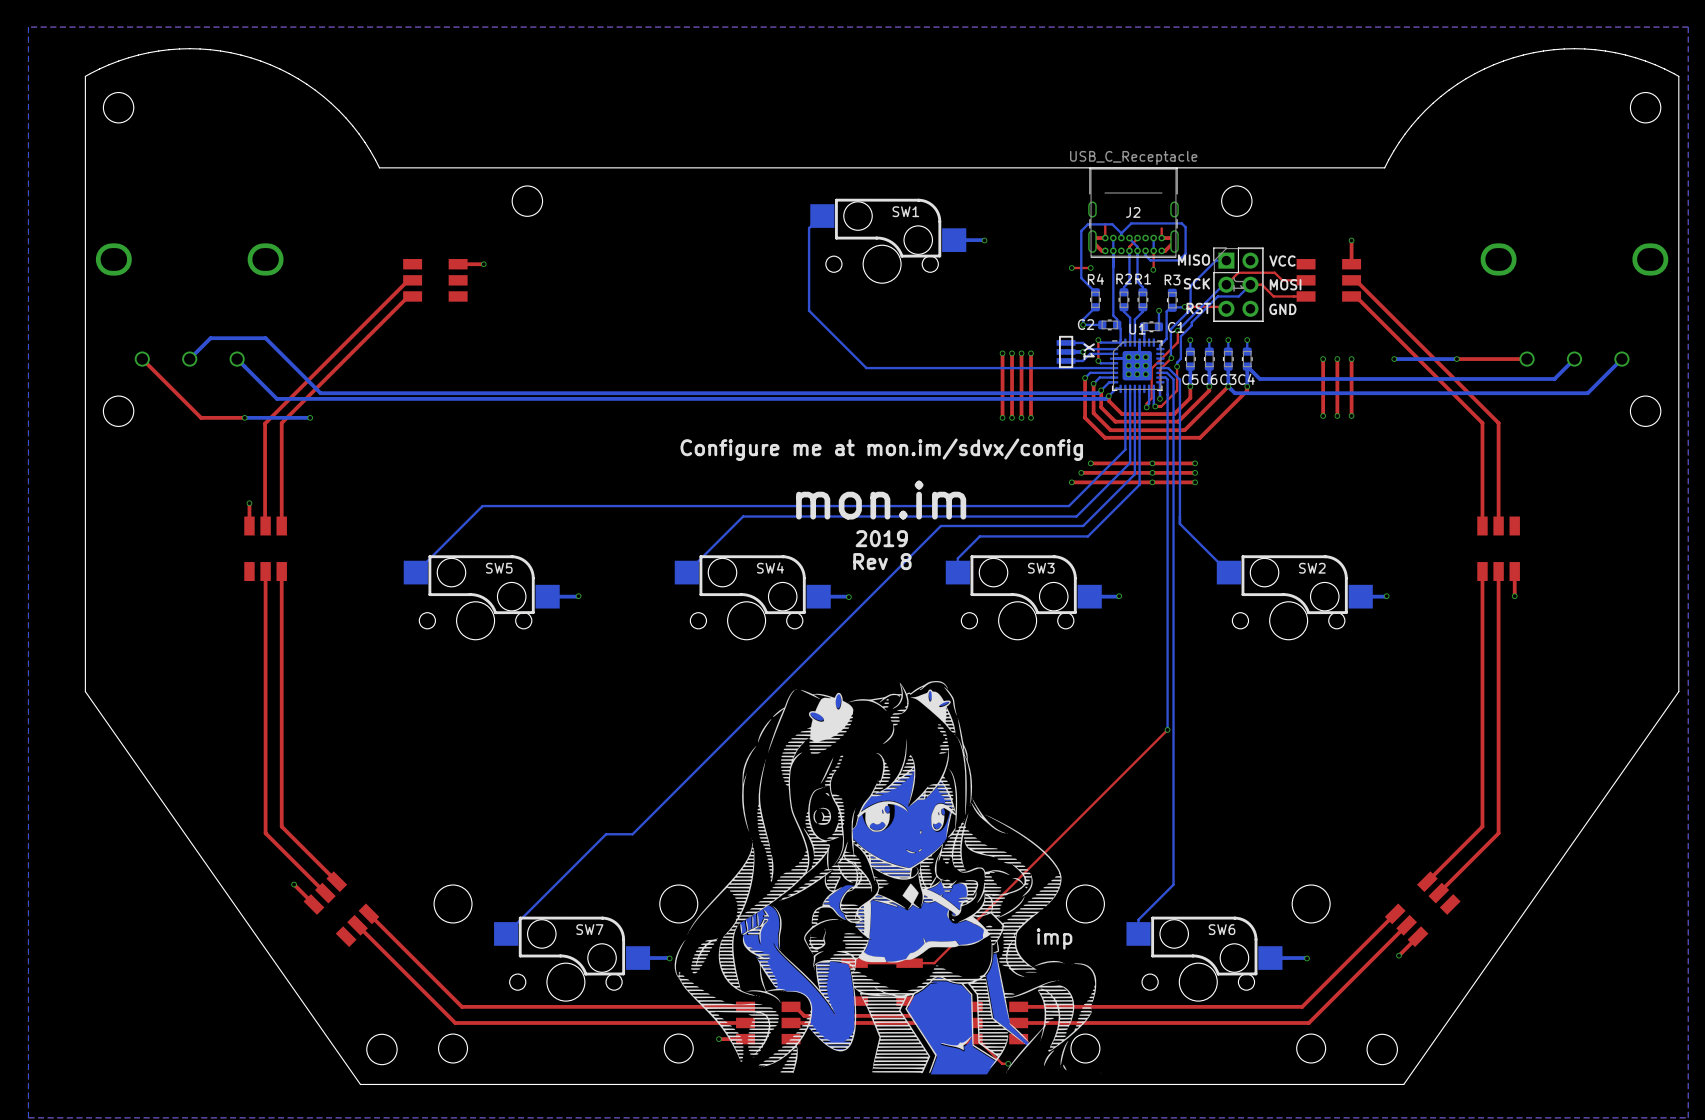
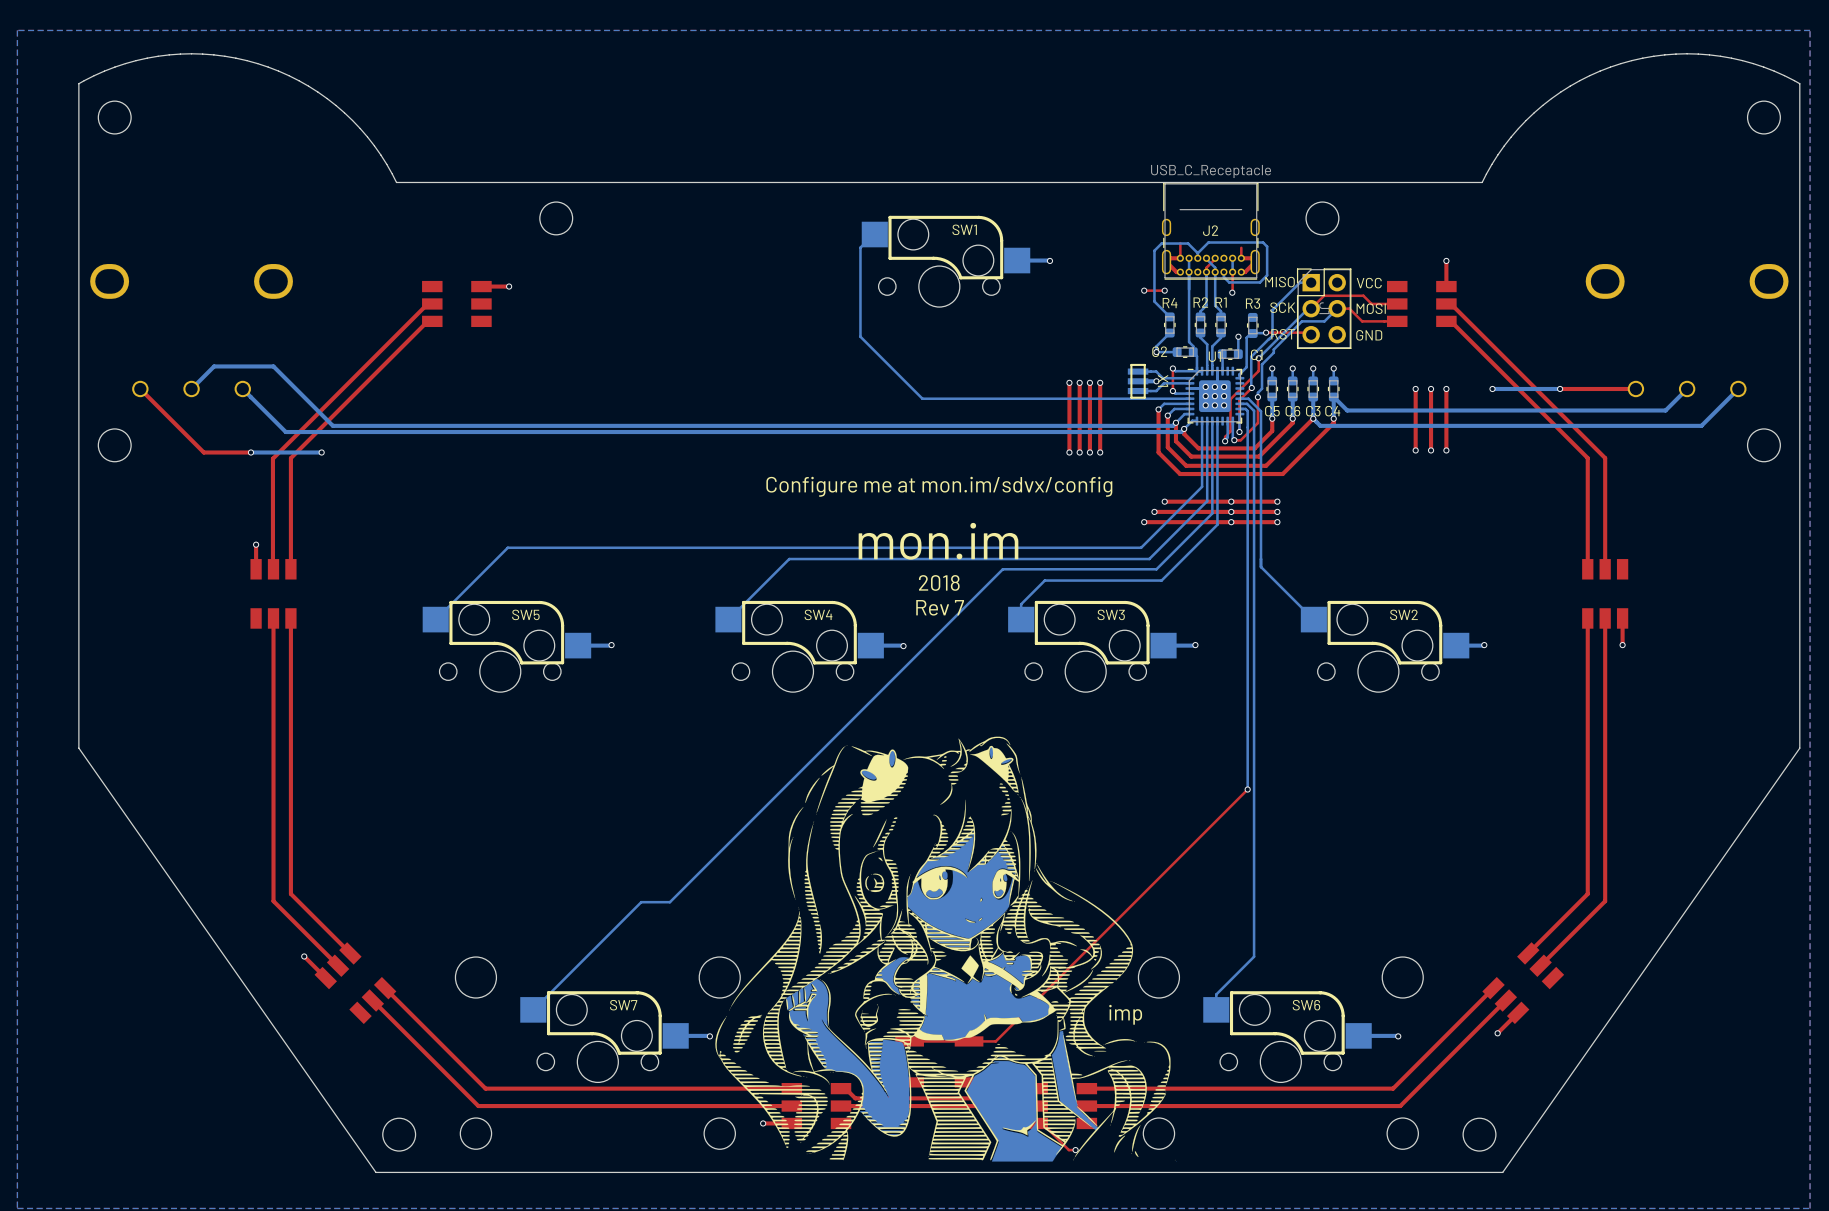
text: 2019 (881, 538) -> 2018 (939, 582)
text: Rev 8 (882, 561) -> Rev 7 (940, 607)

